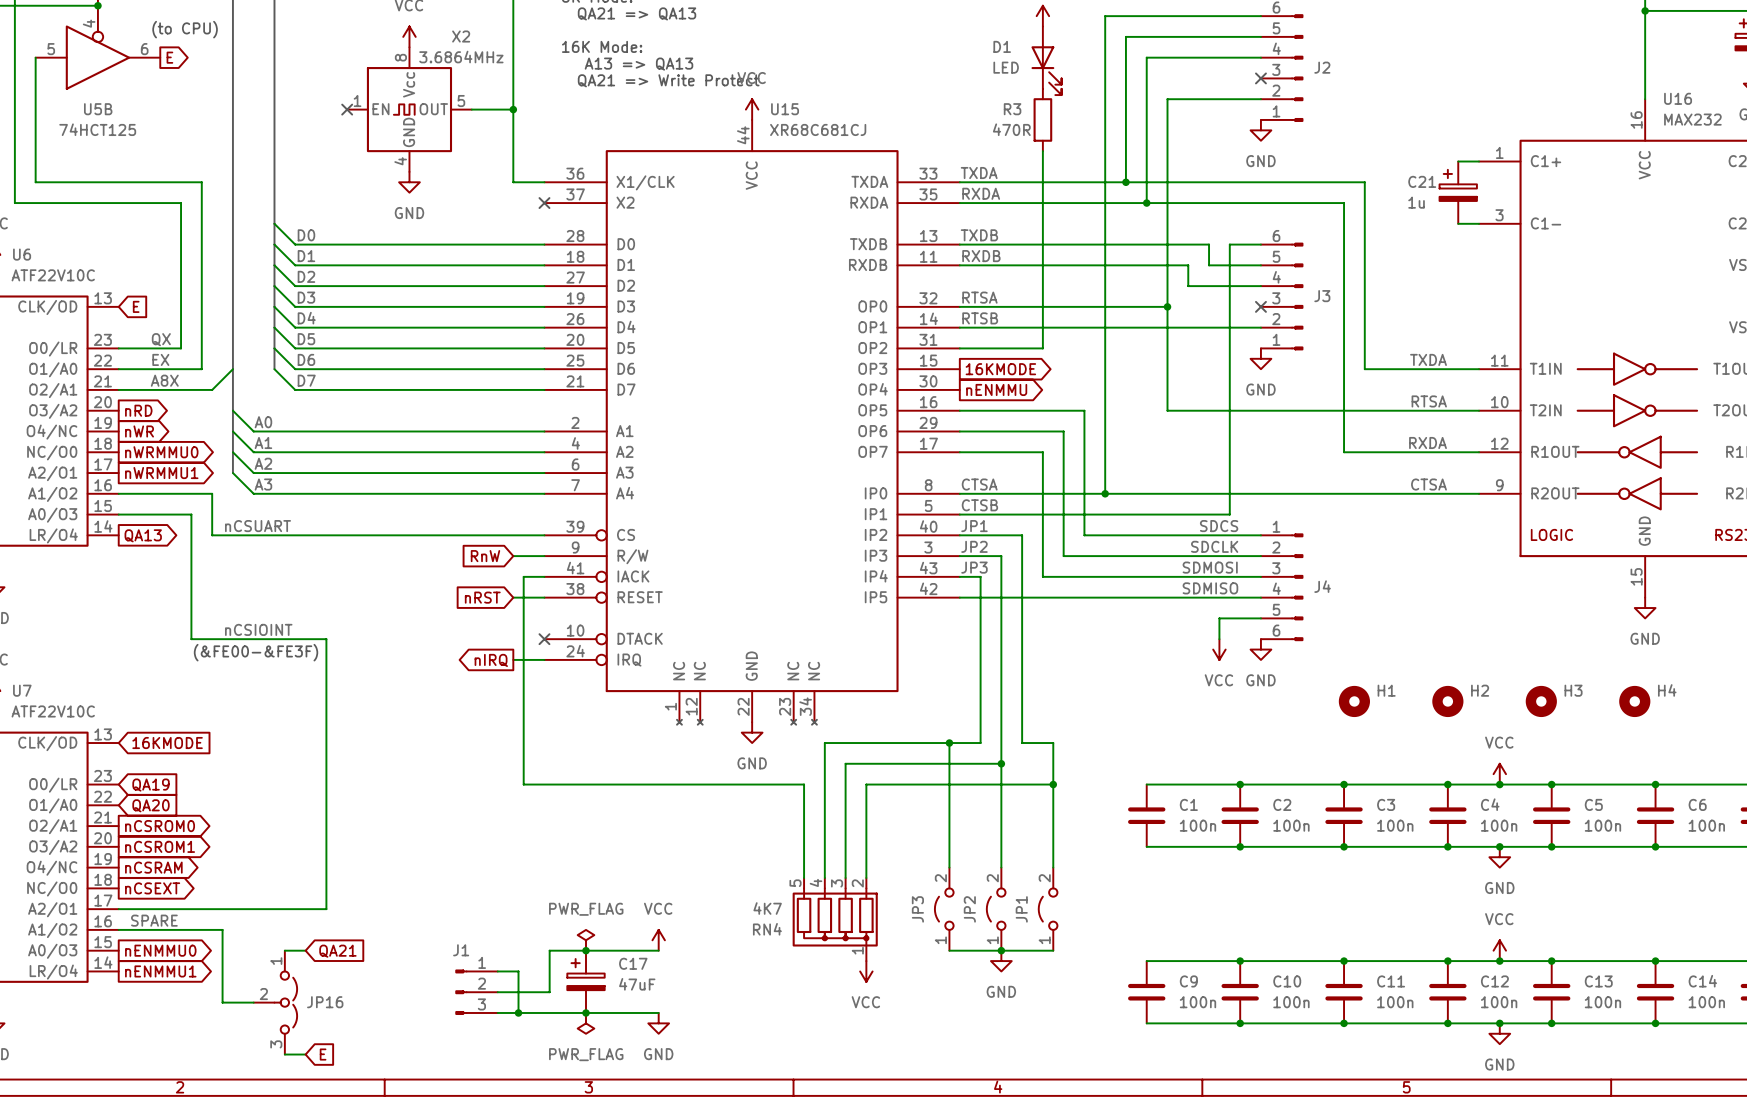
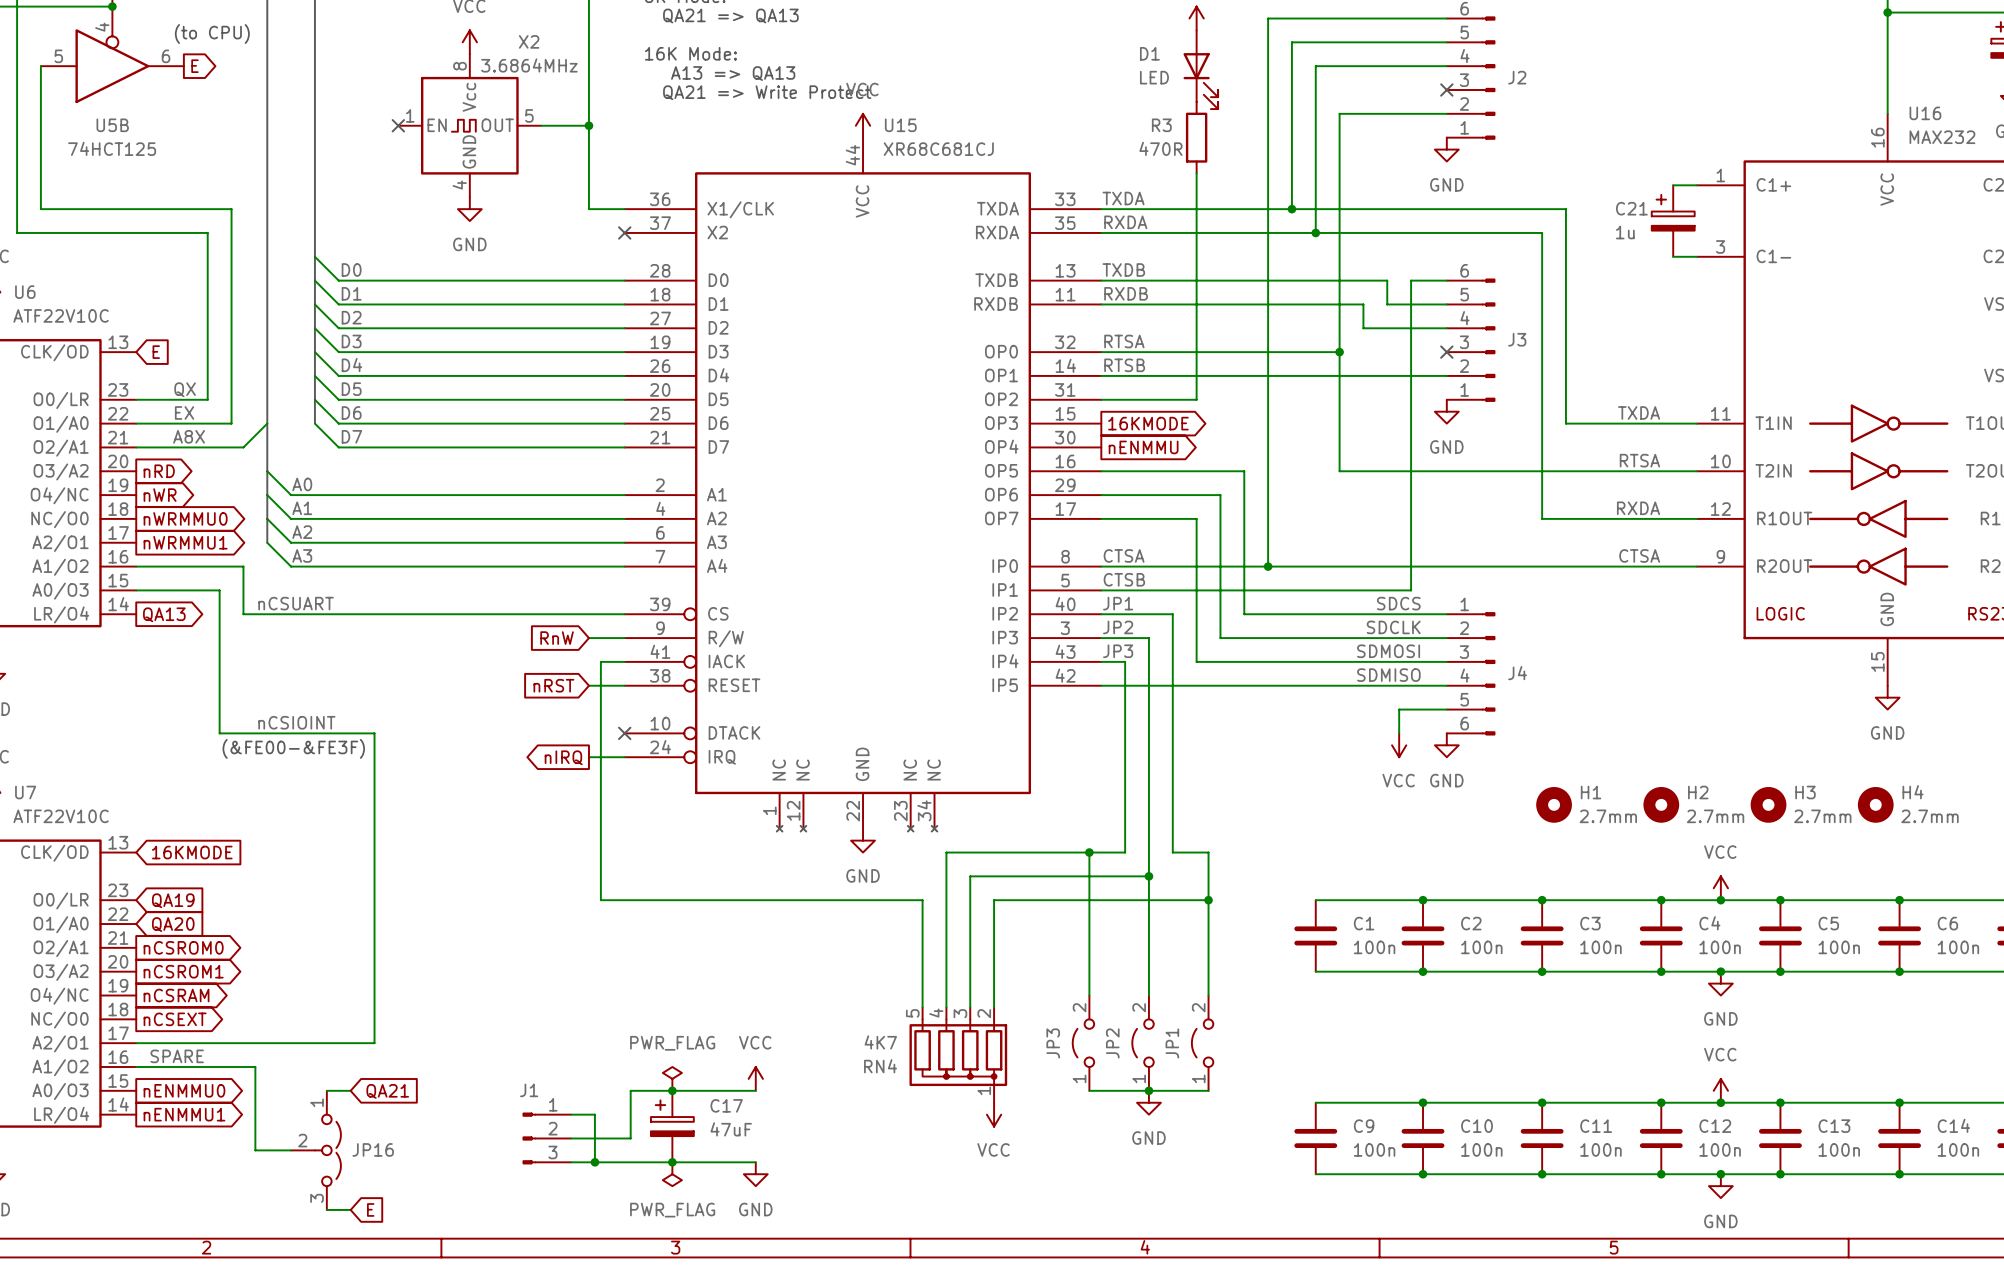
H1 value: none -> 2.7mm (1608, 816)
H2 value: none -> 2.7mm (1715, 816)
H3 value: none -> 2.7mm (1822, 816)
H4 value: none -> 2.7mm (1930, 816)

